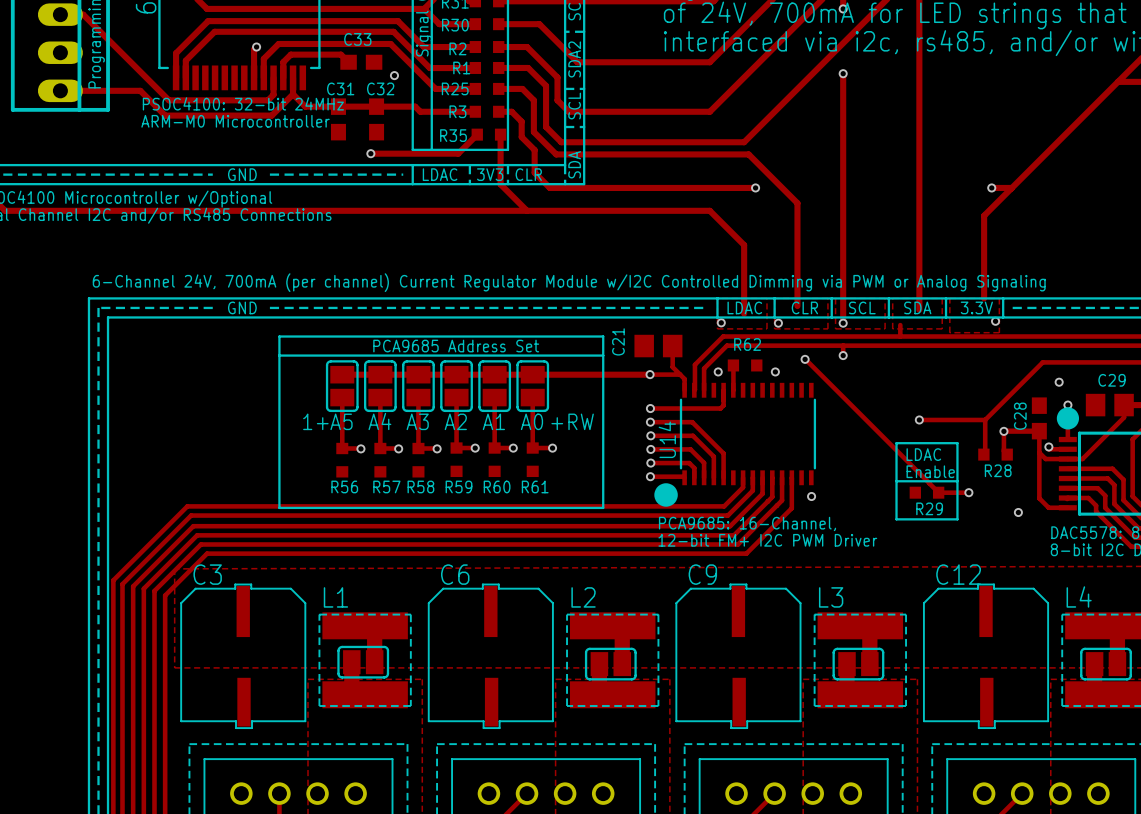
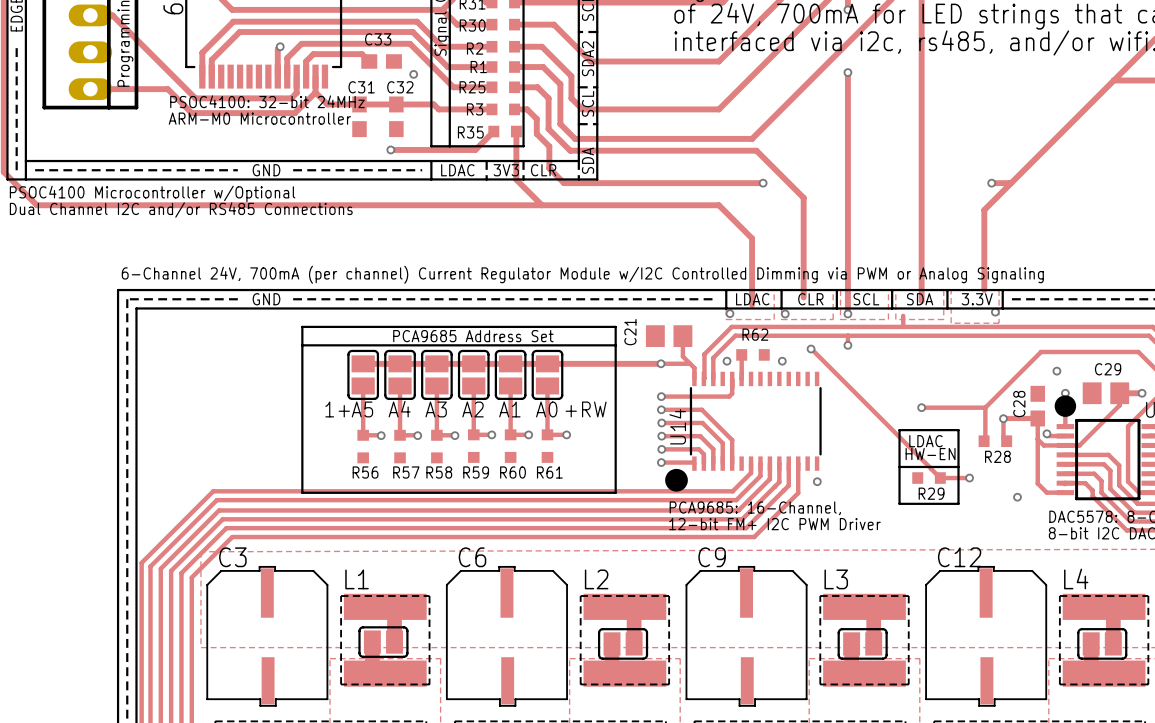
text: Enable (930, 471) -> HW-EN (930, 454)

